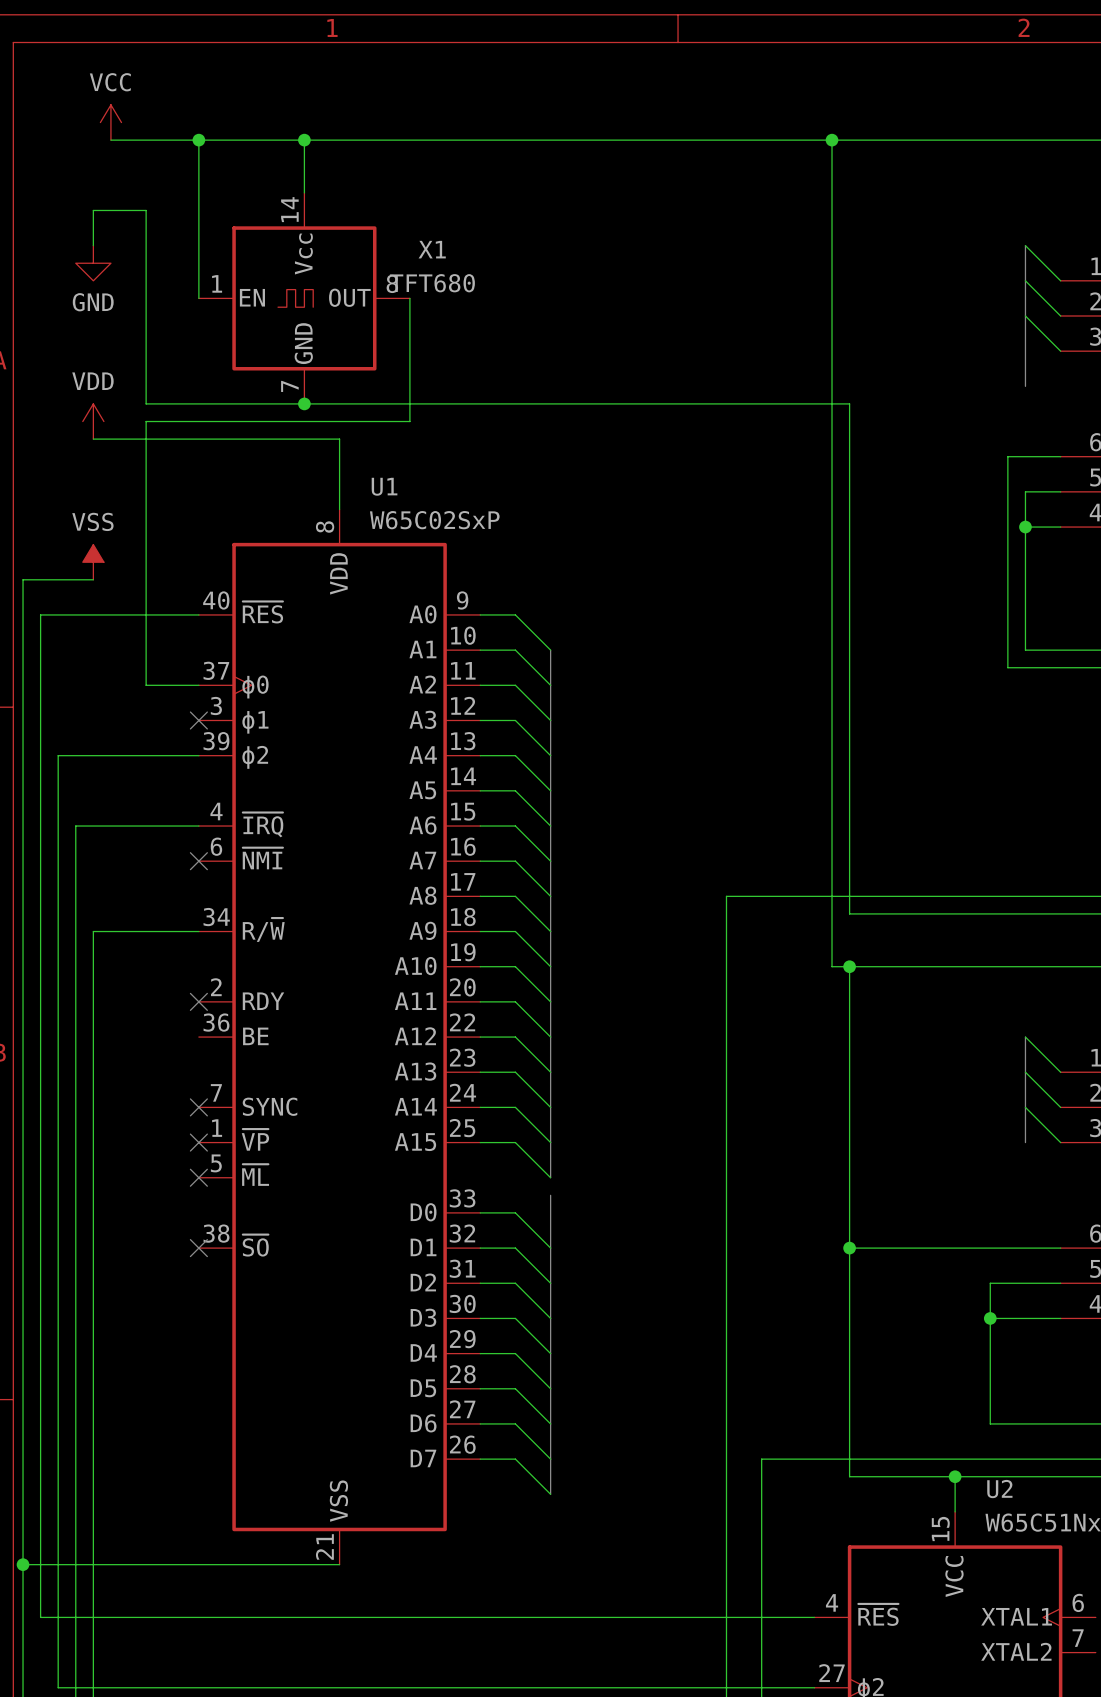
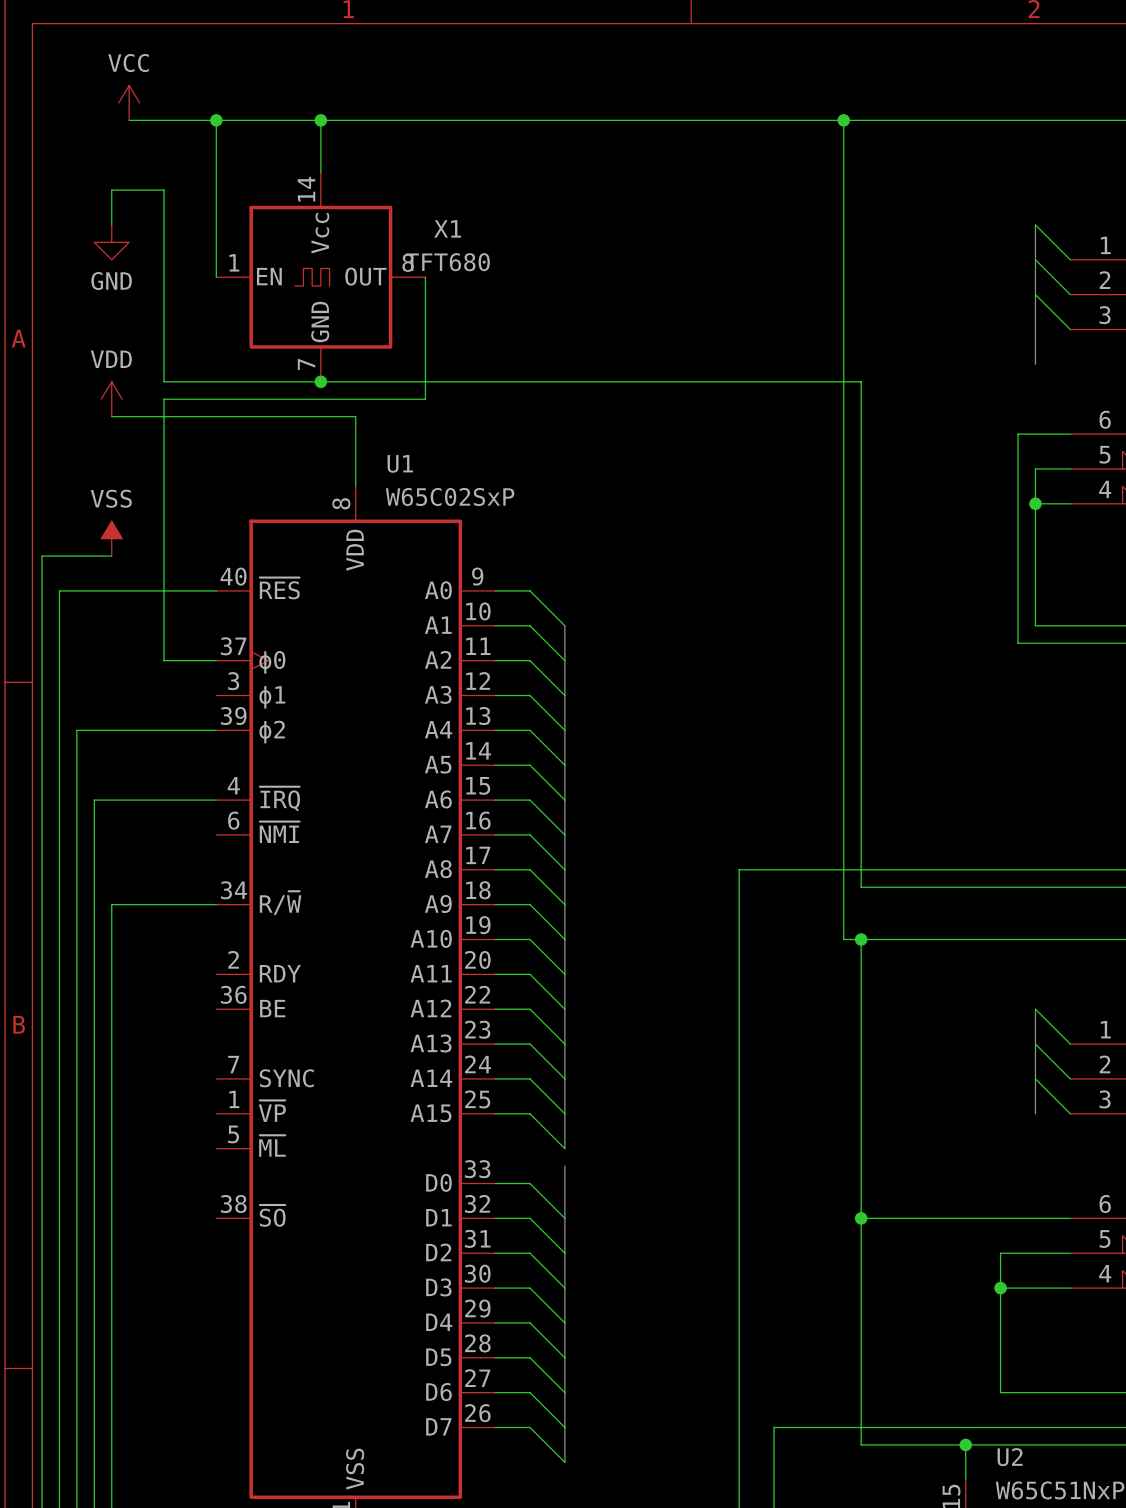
no-connect mark: (198, 720) -> none
no-connect mark: (198, 861) -> none
no-connect mark: (198, 1001) -> none
no-connect mark: (198, 1107) -> none
no-connect mark: (198, 1142) -> none
no-connect mark: (198, 1177) -> none
no-connect mark: (198, 1248) -> none

